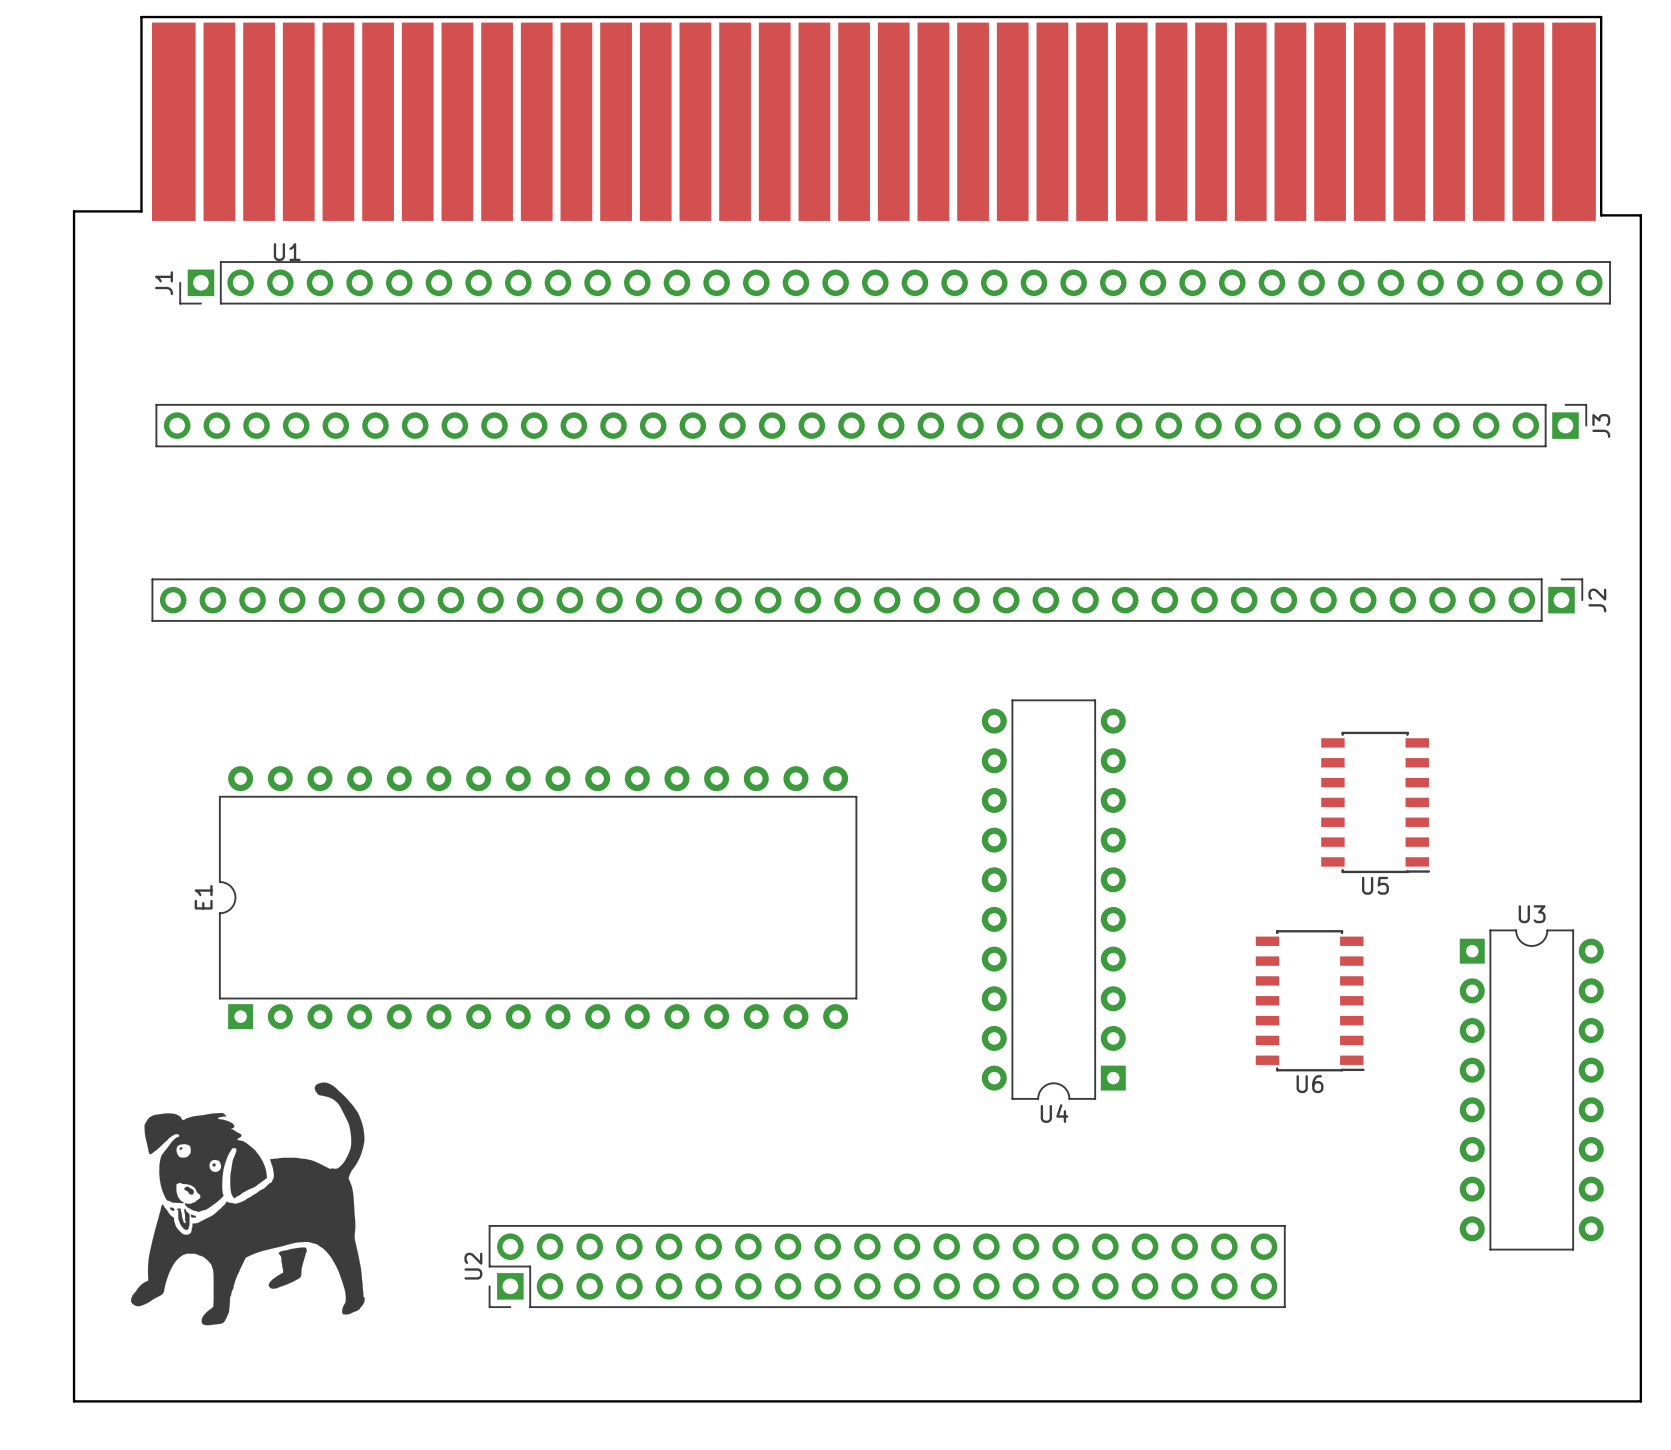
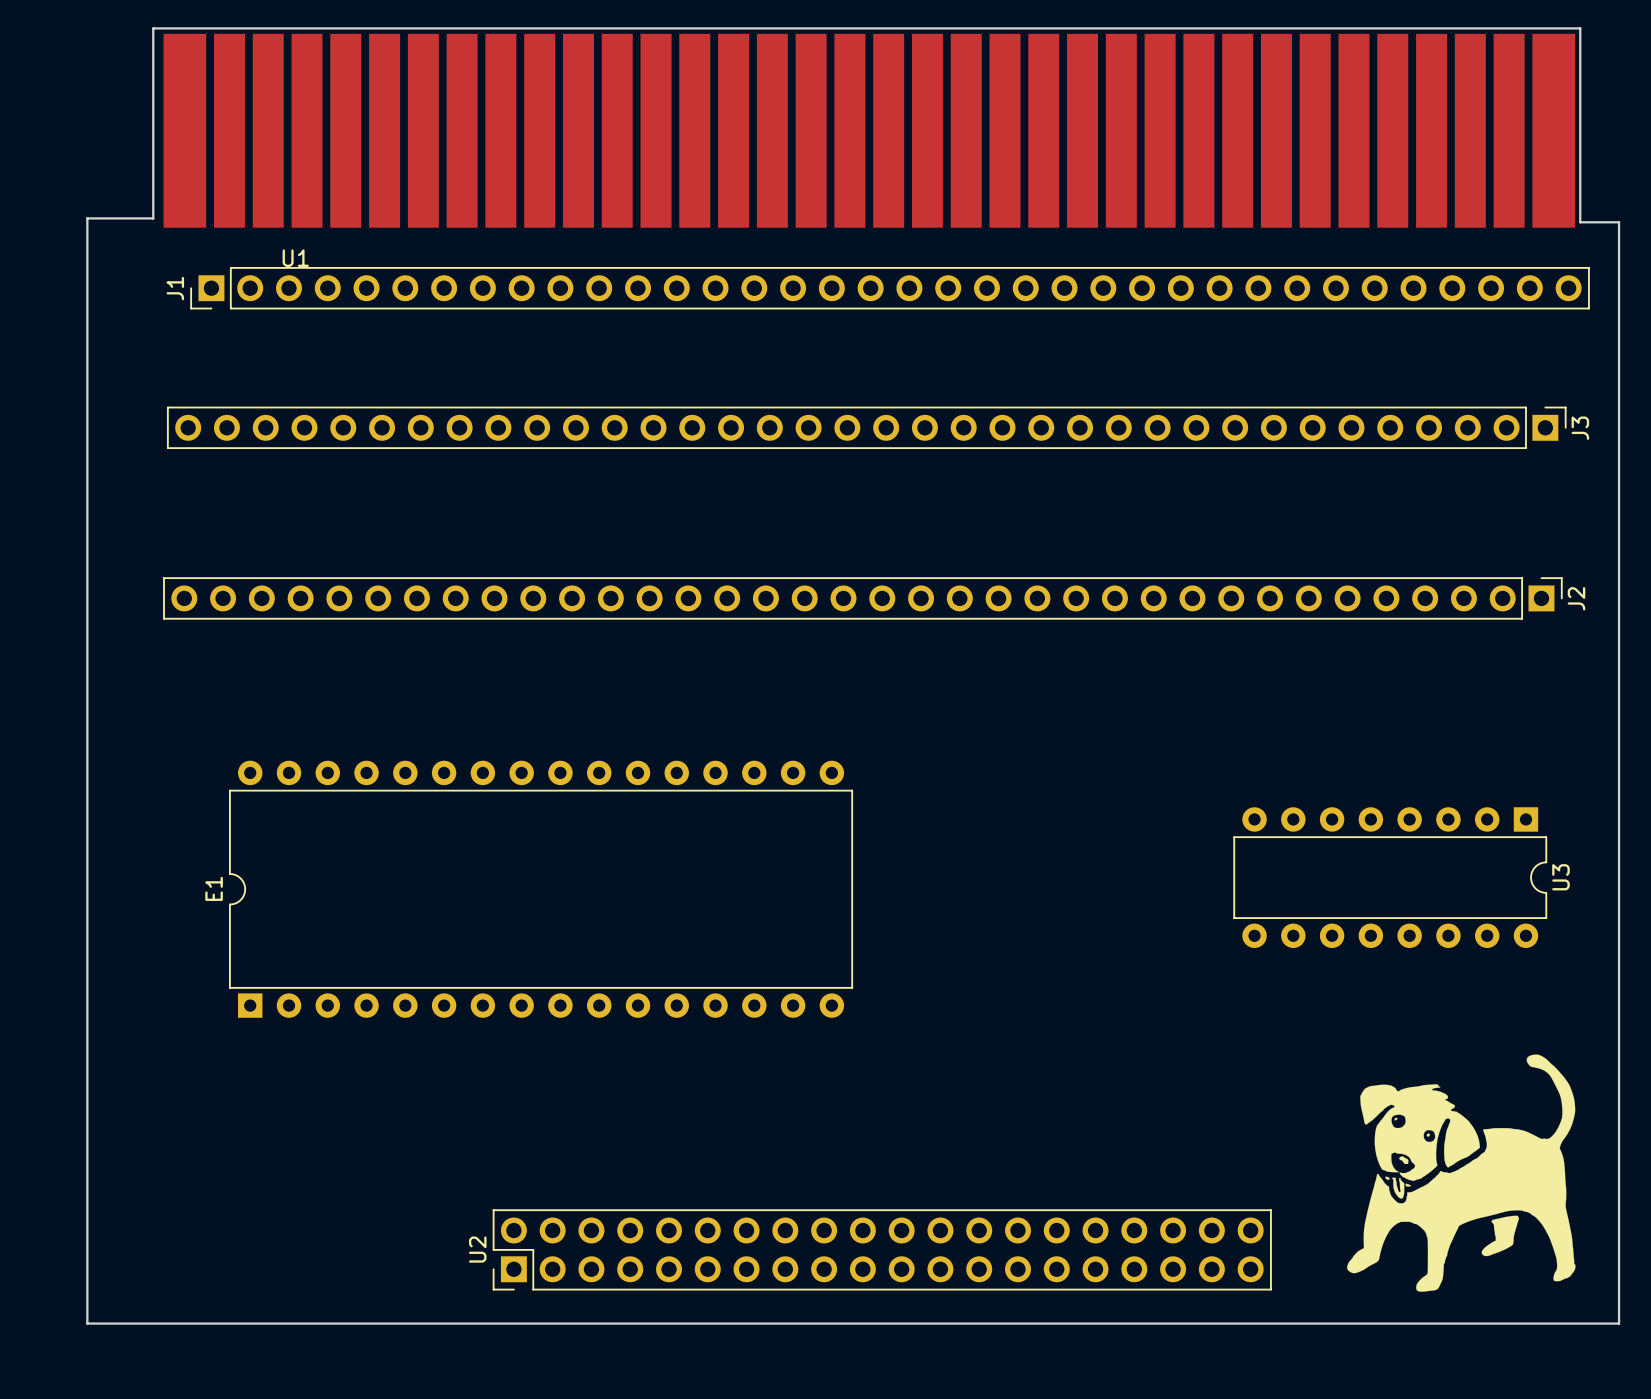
U5: (1375, 802) -> none
U4: (1053, 899) -> none
U6: (1310, 1000) -> none
drawing: none -> [1347, 1054, 1576, 1292]
drawing: [131, 1082, 365, 1326] -> none
U3 rotation: 0° (1531, 1090) -> 90° clockwise (1390, 877)
U3 position: (1531, 1090) -> (1390, 877)
board edge: (74, 1341) (74, 1401) (1640, 1401) (1640, 1341) -> (87, 1323) (1619, 1323)

